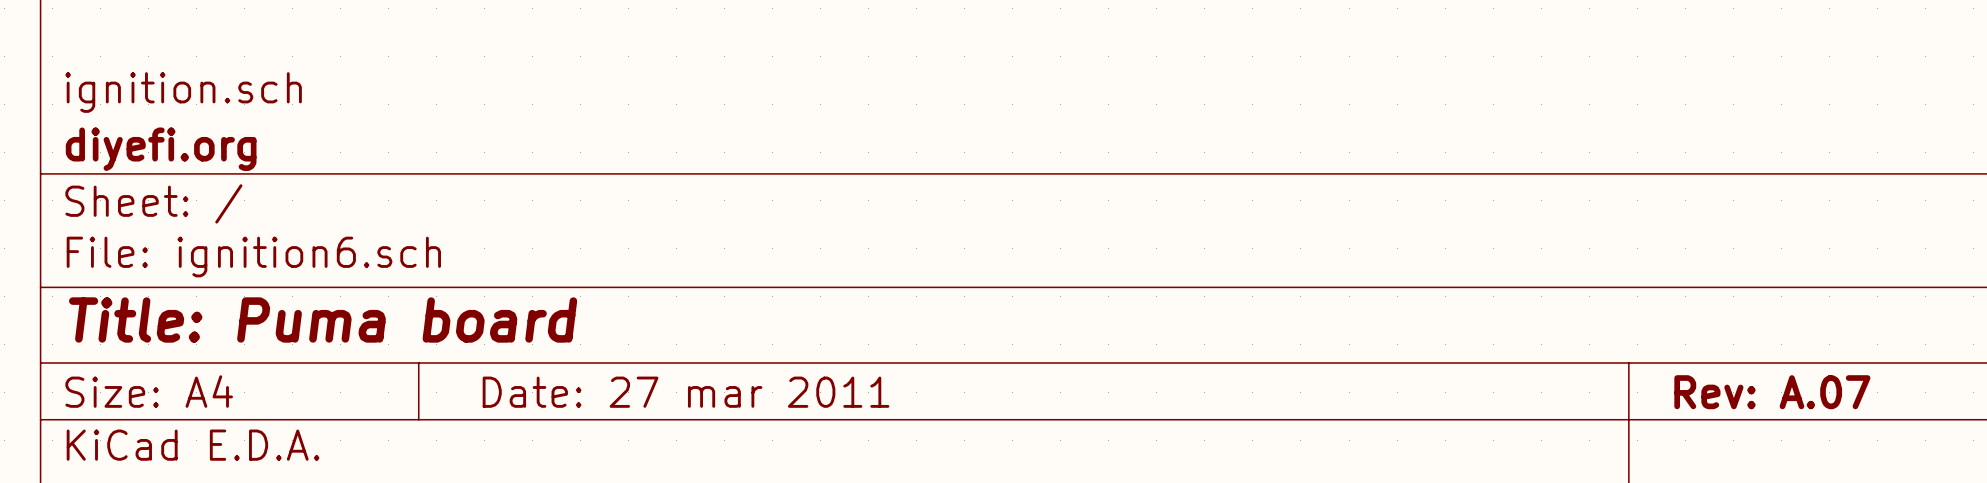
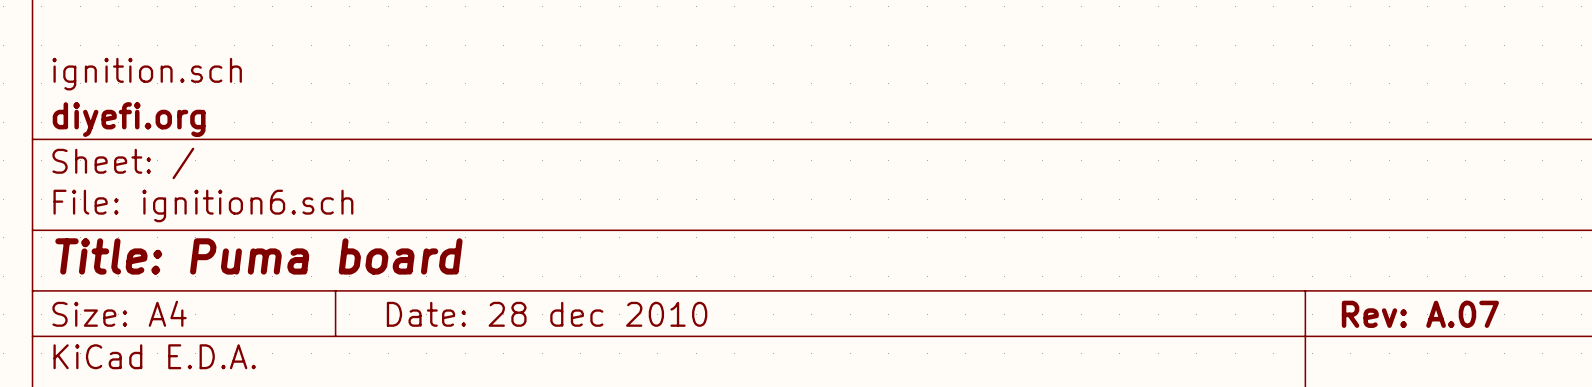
title block: Date: 27 mar 2011 (686, 392) -> Date: 28 dec 2010 (547, 314)

